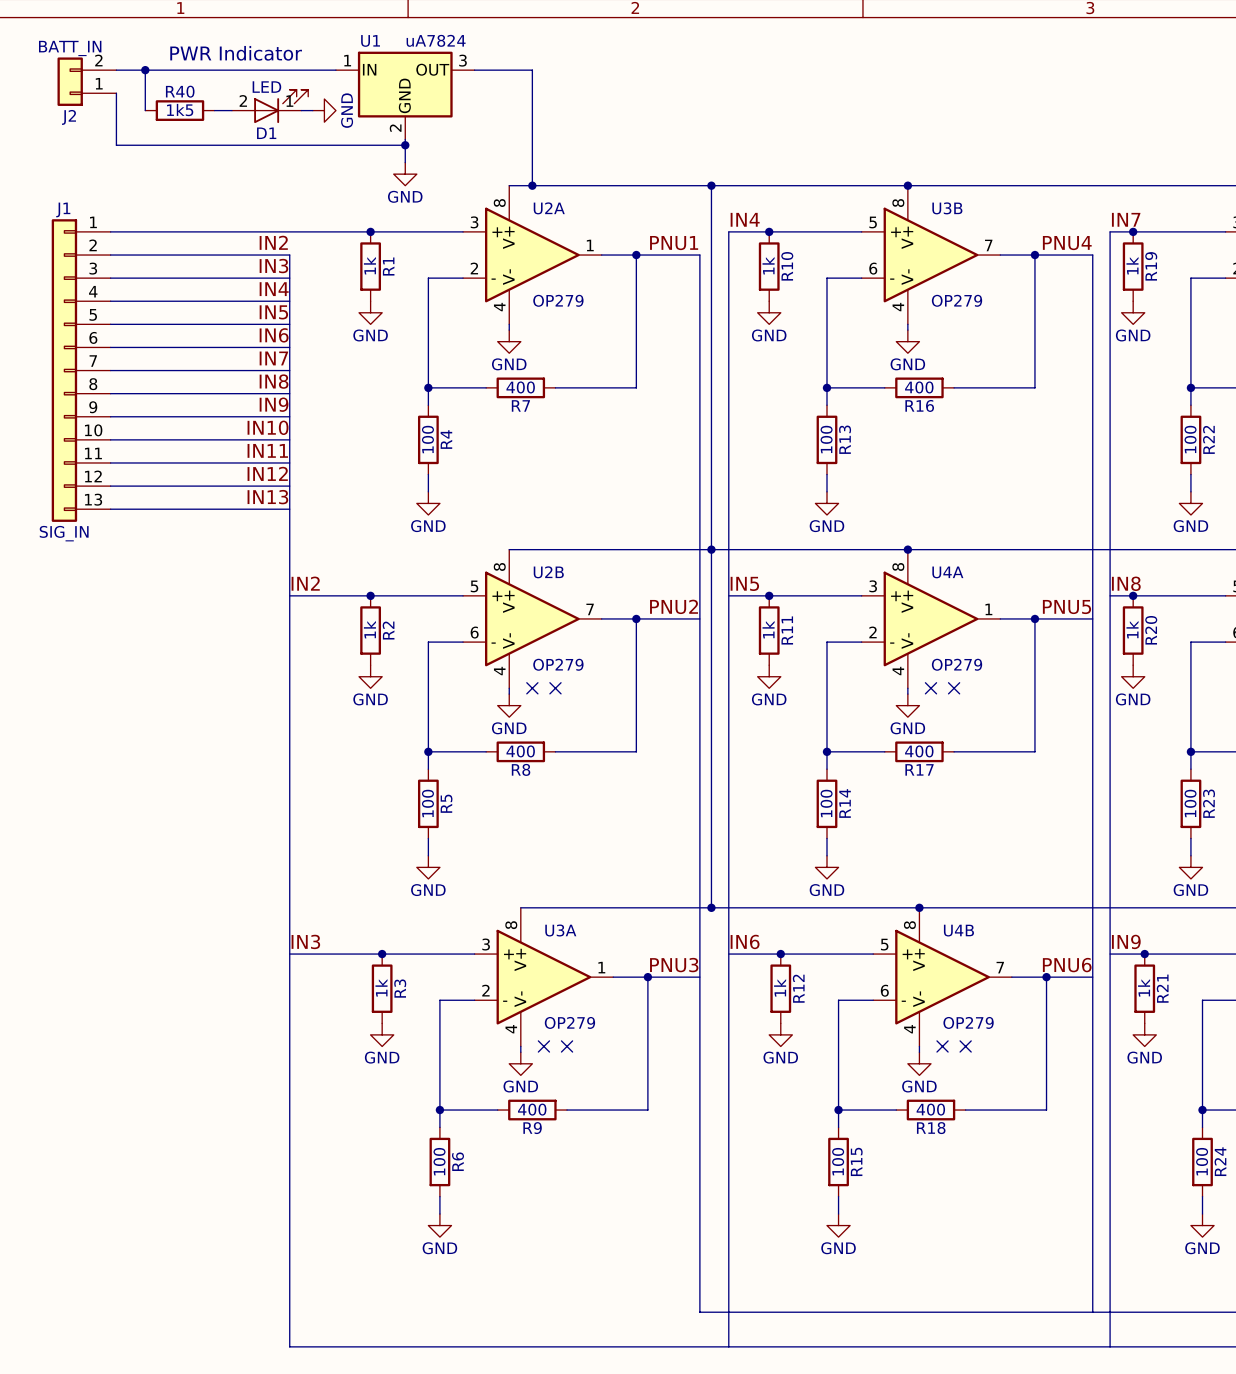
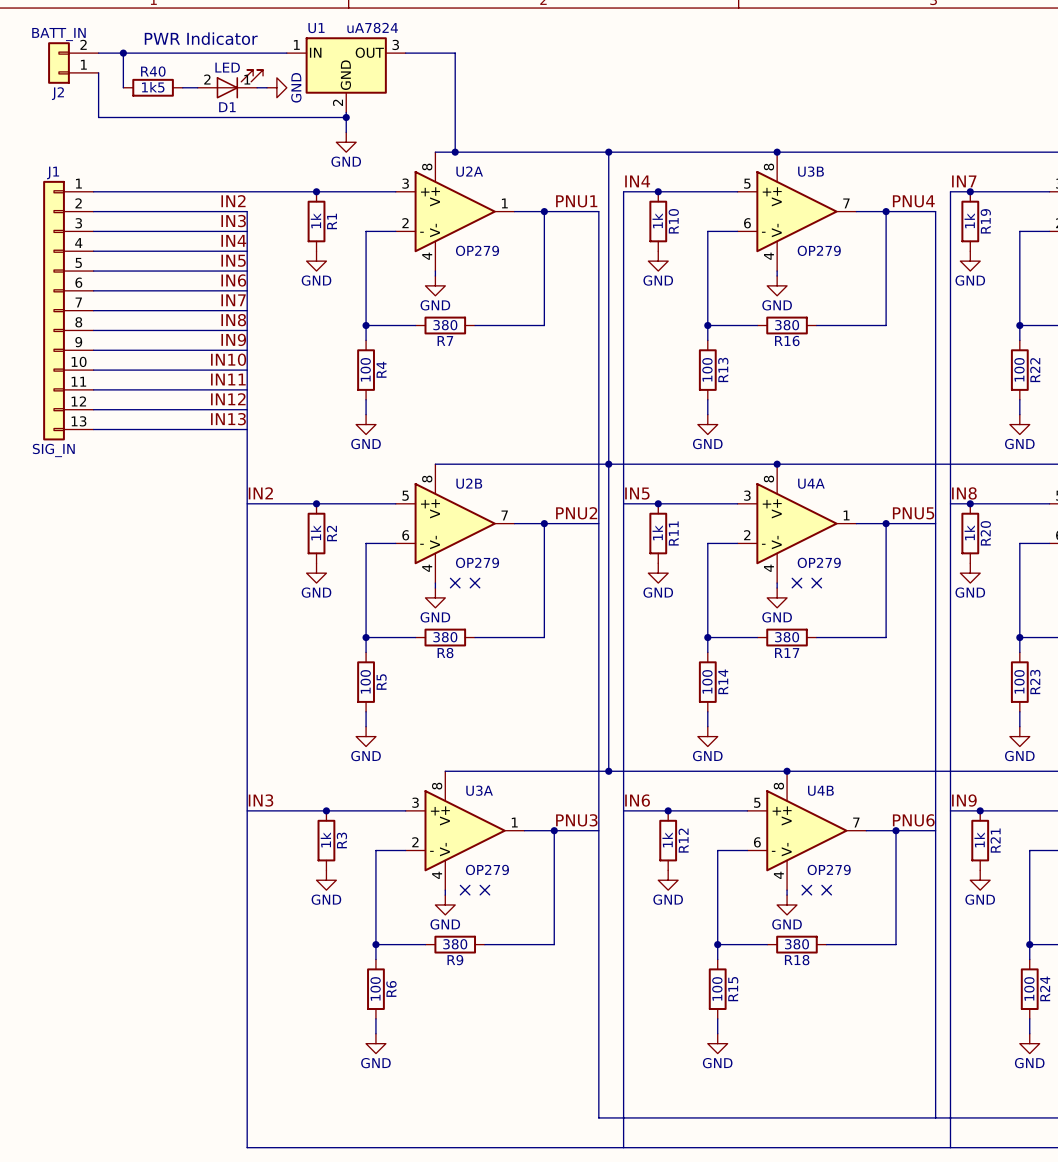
R7 value: 400 (520, 387) -> 380 (445, 325)
R16 value: 400 (919, 387) -> 380 (787, 325)
R8 value: 400 (520, 751) -> 380 (445, 637)
R17 value: 400 (919, 751) -> 380 (787, 637)
R9 value: 400 (532, 1109) -> 380 (455, 944)
R18 value: 400 (930, 1109) -> 380 (797, 944)

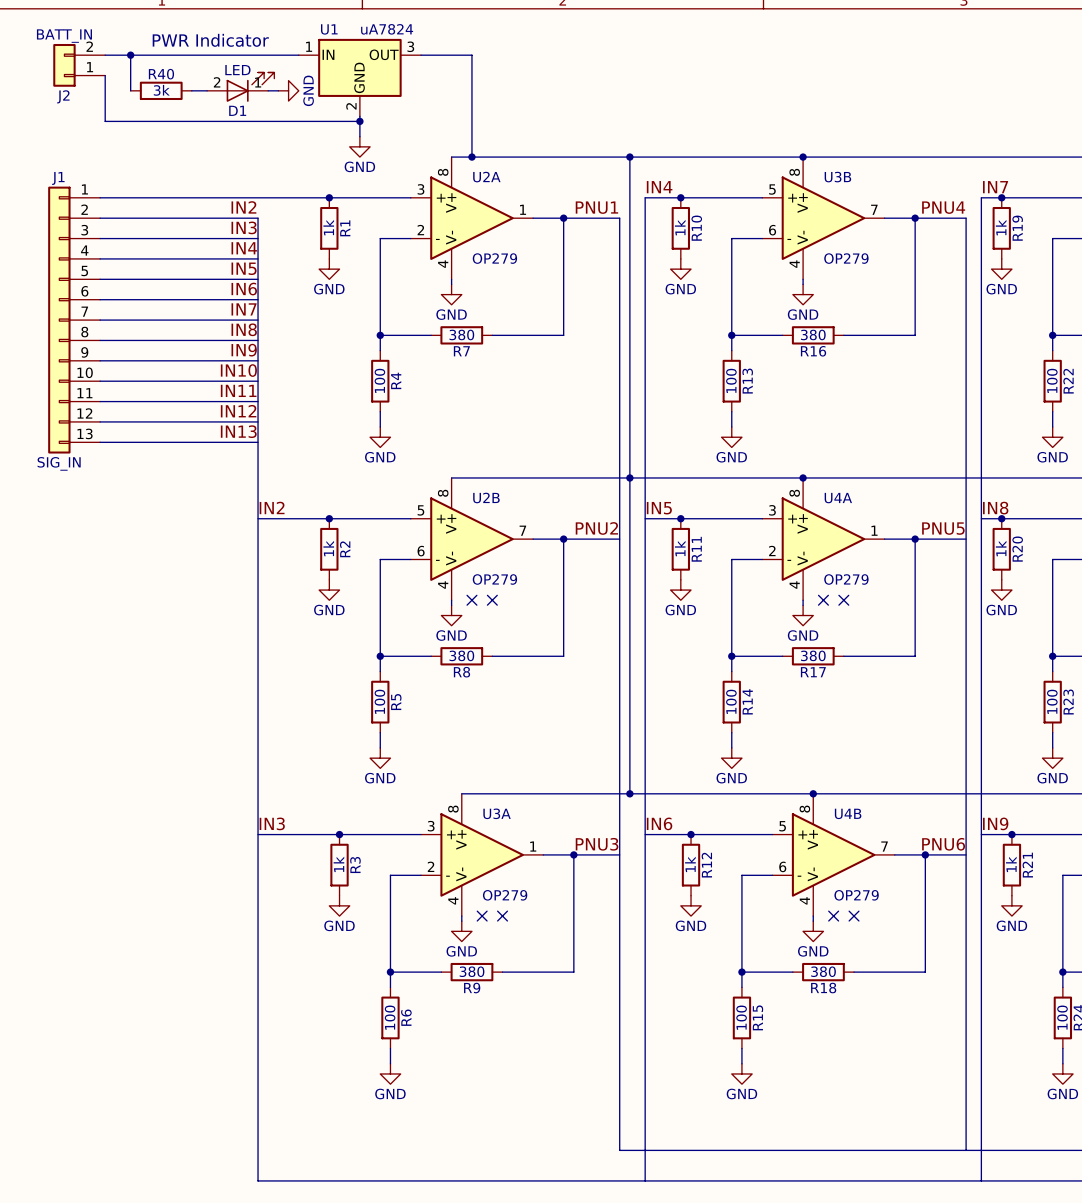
R40 value: 1k5 (153, 87) -> 3k (161, 90)

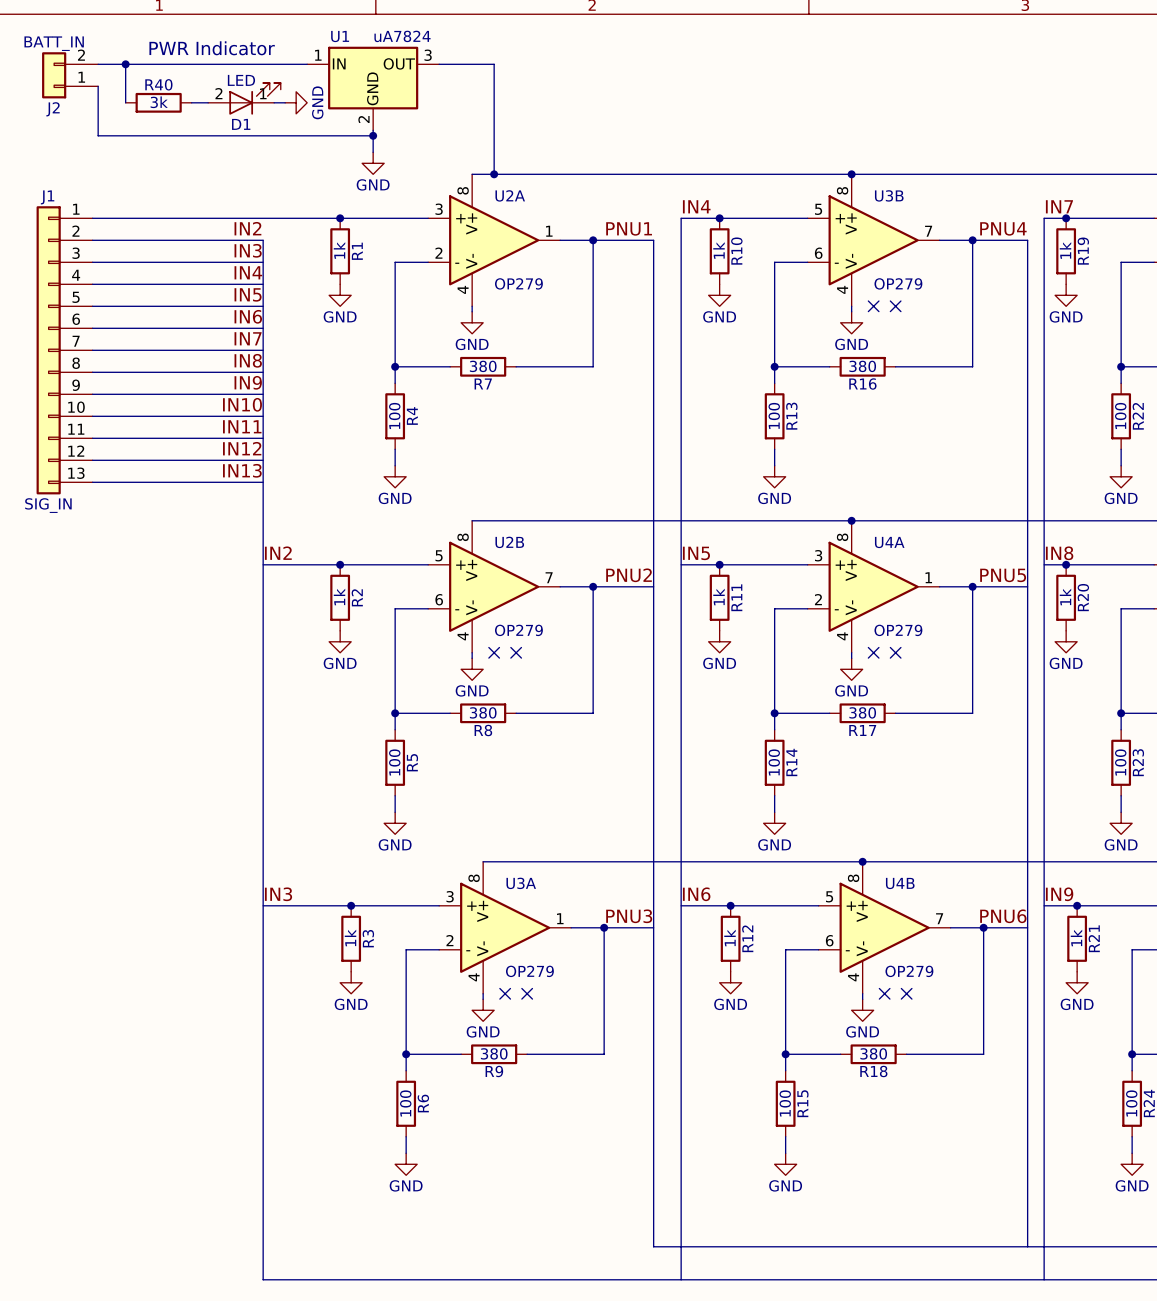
wire: (629, 157) (629, 793) -> none
junction: (629, 157) -> none
no-connect mark: none -> (873, 306)
no-connect mark: none -> (895, 306)
junction: (629, 477) -> none
junction: (629, 793) -> none

